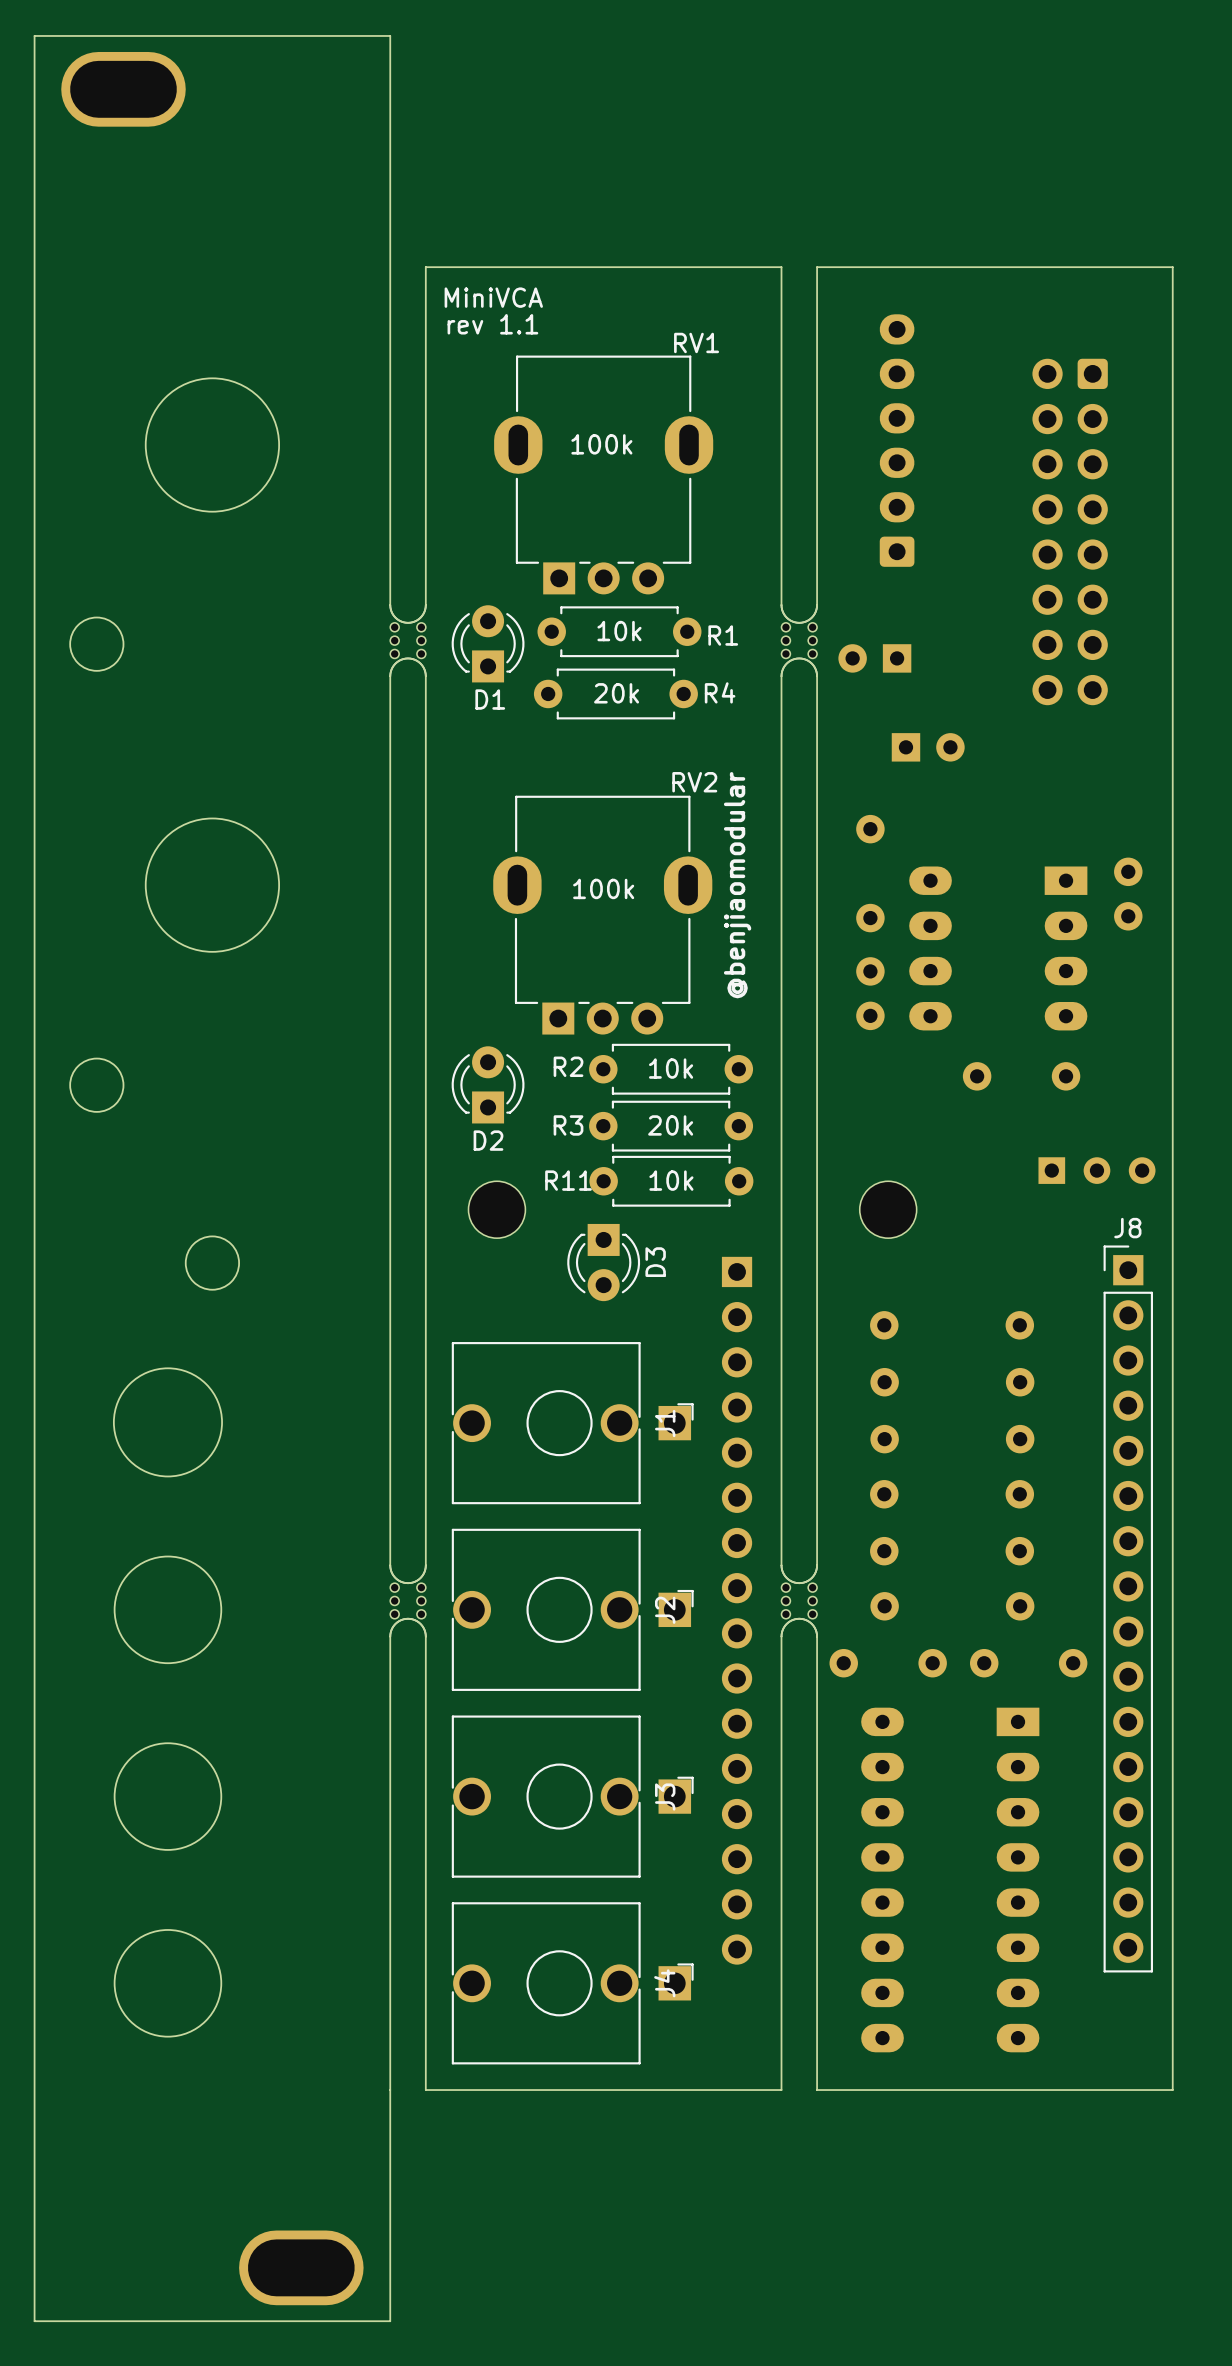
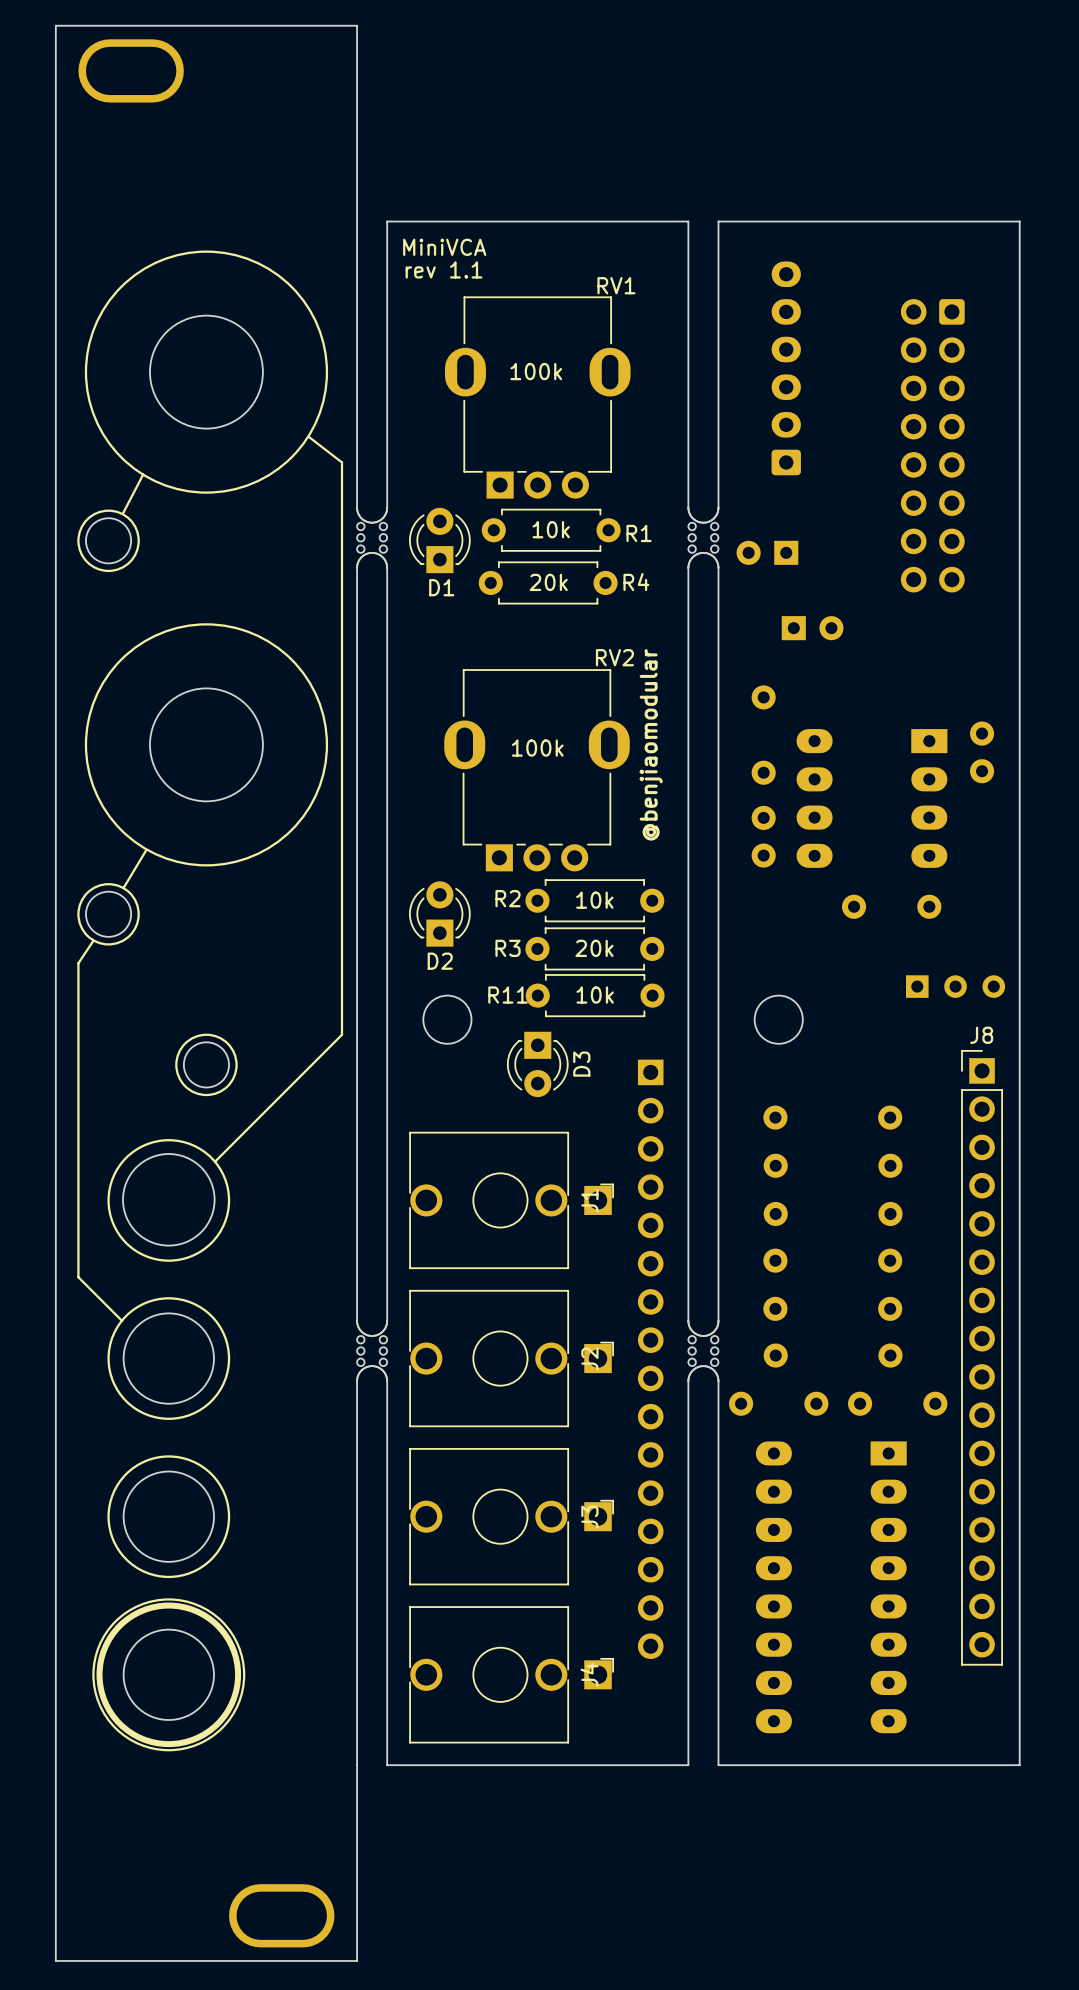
drawing: none -> [77, 250, 329, 573]
line: none -> (308, 436) (341, 462) (341, 1034) (215, 1161)
line: none -> (143, 474) (122, 513)
drawing: none -> [77, 623, 329, 946]
line: none -> (146, 850) (123, 887)
line: none -> (93, 940) (78, 963) (78, 1277) (122, 1320)
drawing: none -> [175, 1033, 238, 1097]
drawing: none -> [107, 1139, 231, 1262]
drawing: none -> [107, 1297, 231, 1420]
drawing: none -> [107, 1455, 231, 1579]
drawing: none -> [92, 1598, 246, 1752]

